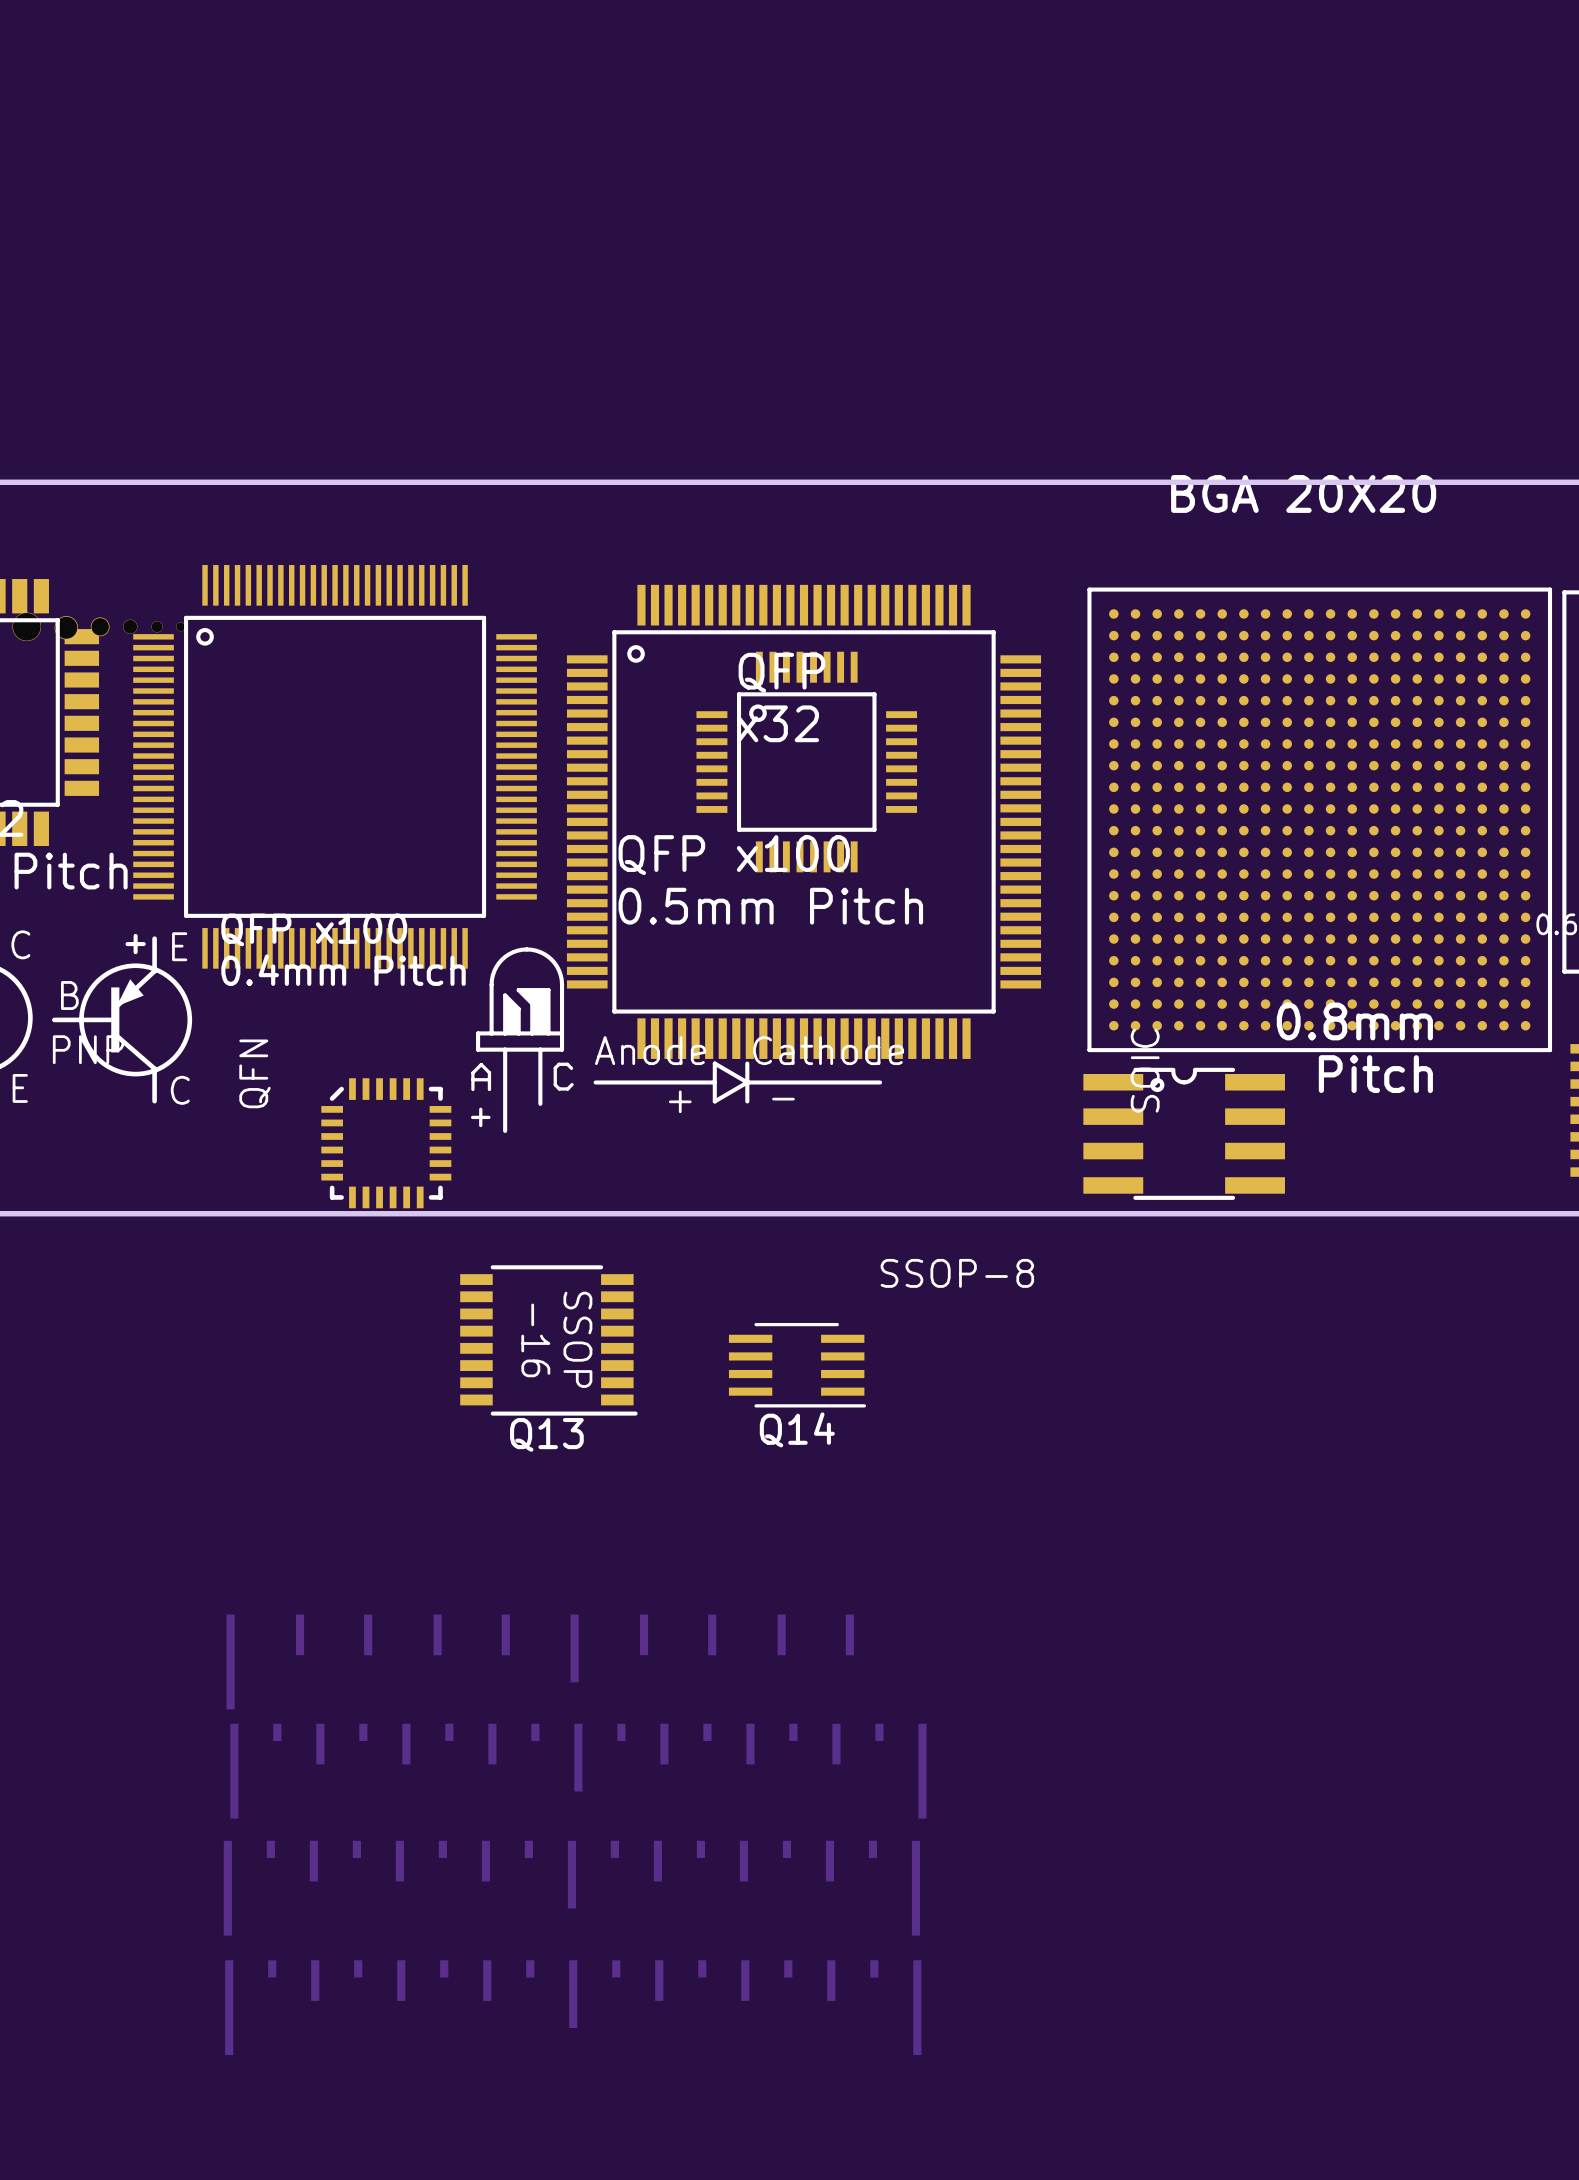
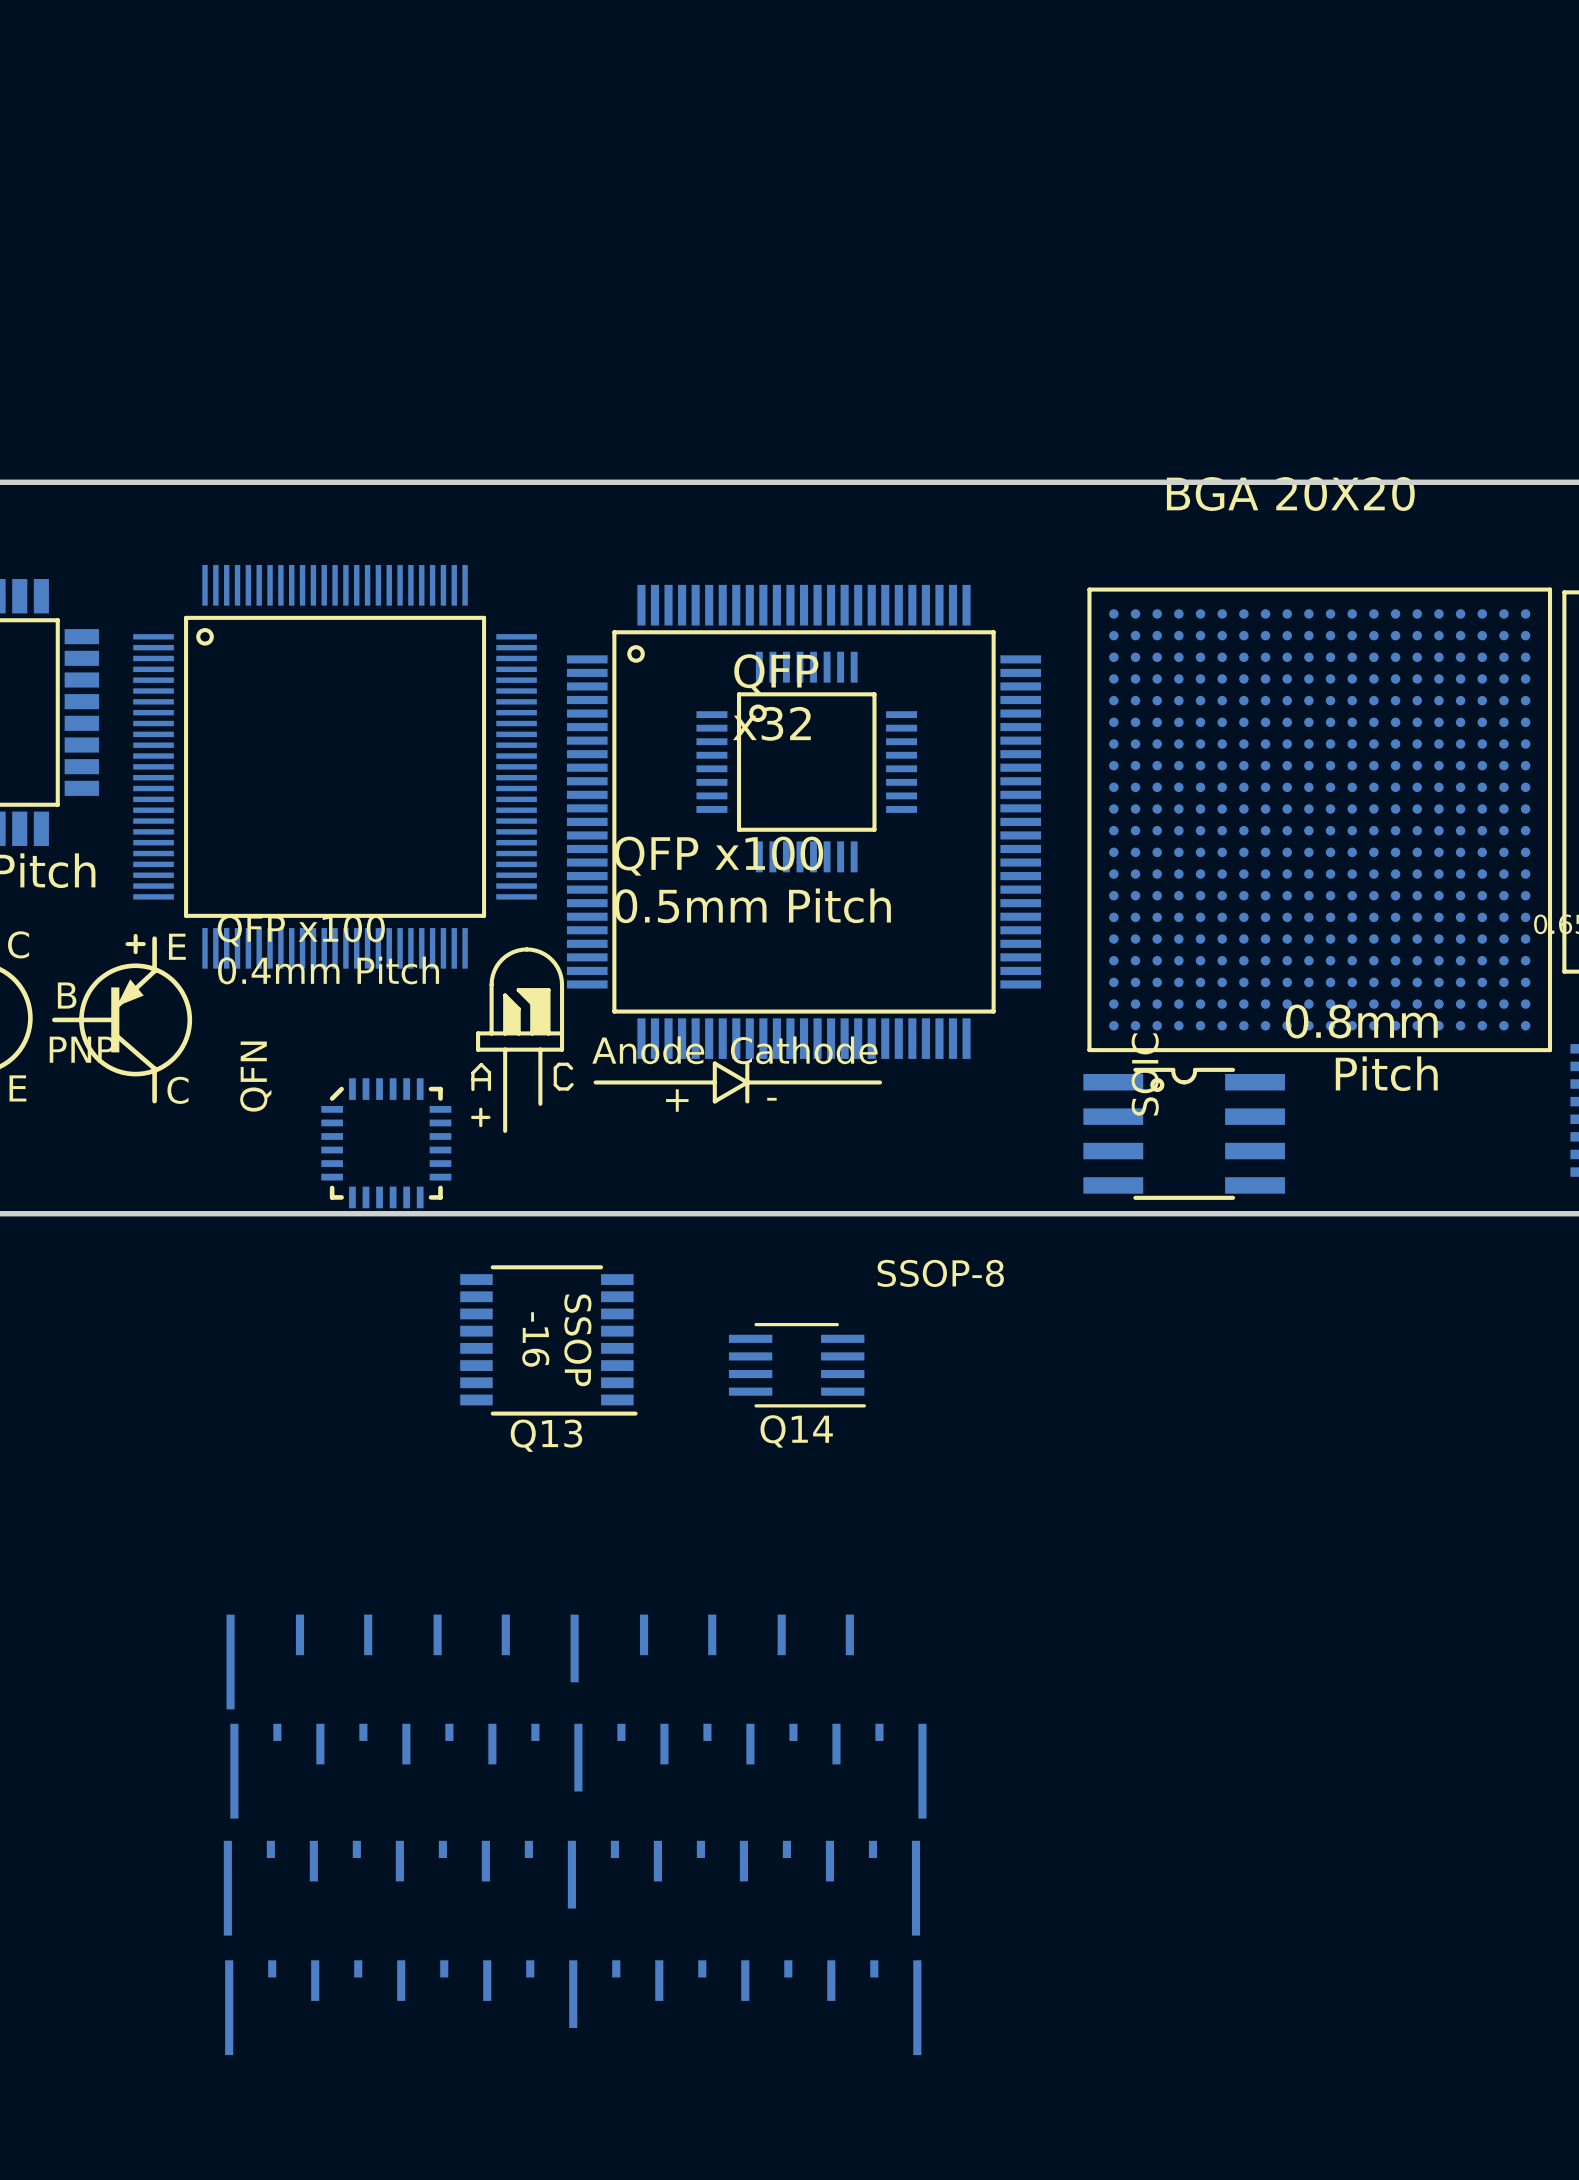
part: (26, 626) -> none
part: (100, 626) -> none
part: (130, 626) -> none
part: (157, 626) -> none
part: (180, 626) -> none
part: (66, 627) -> none

